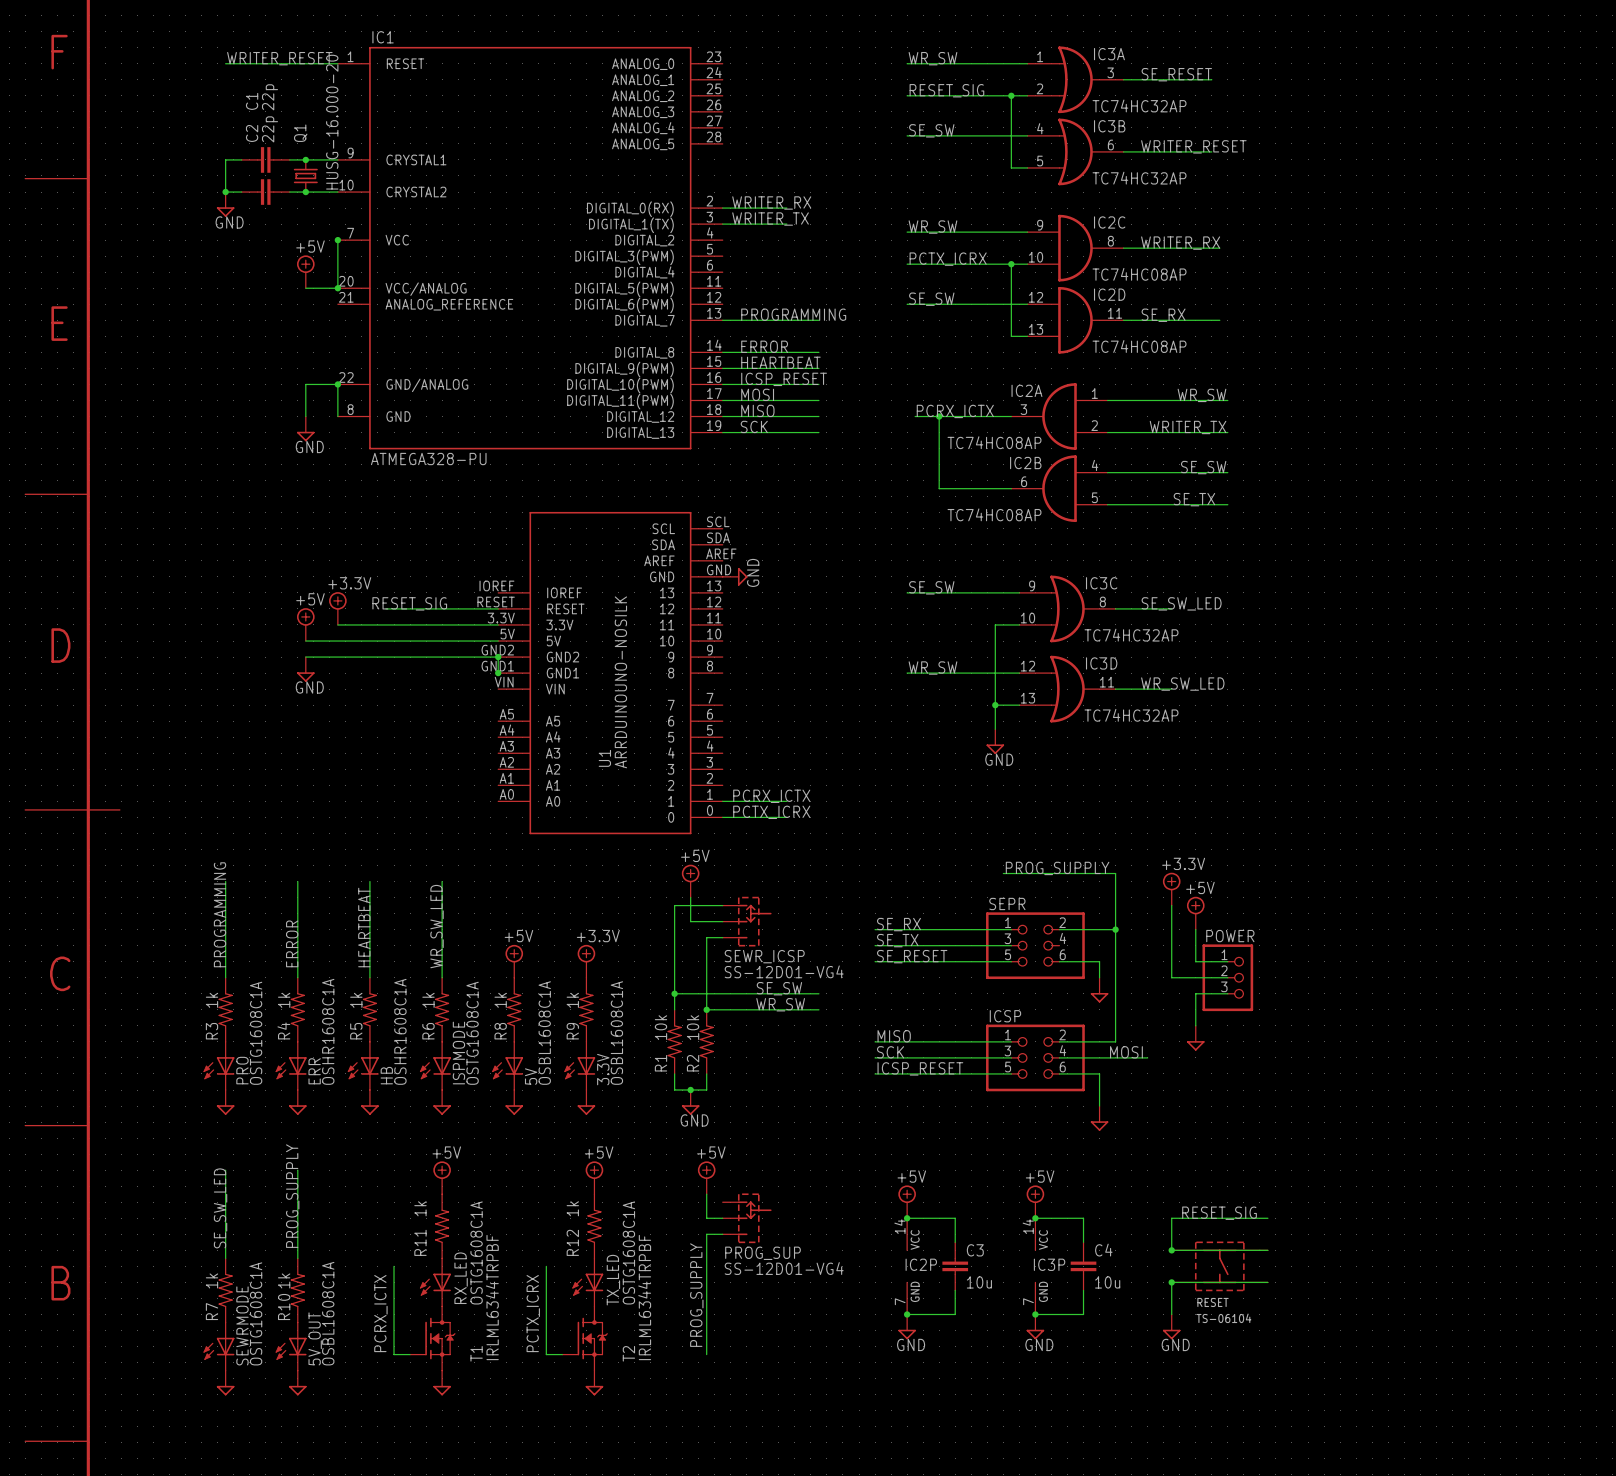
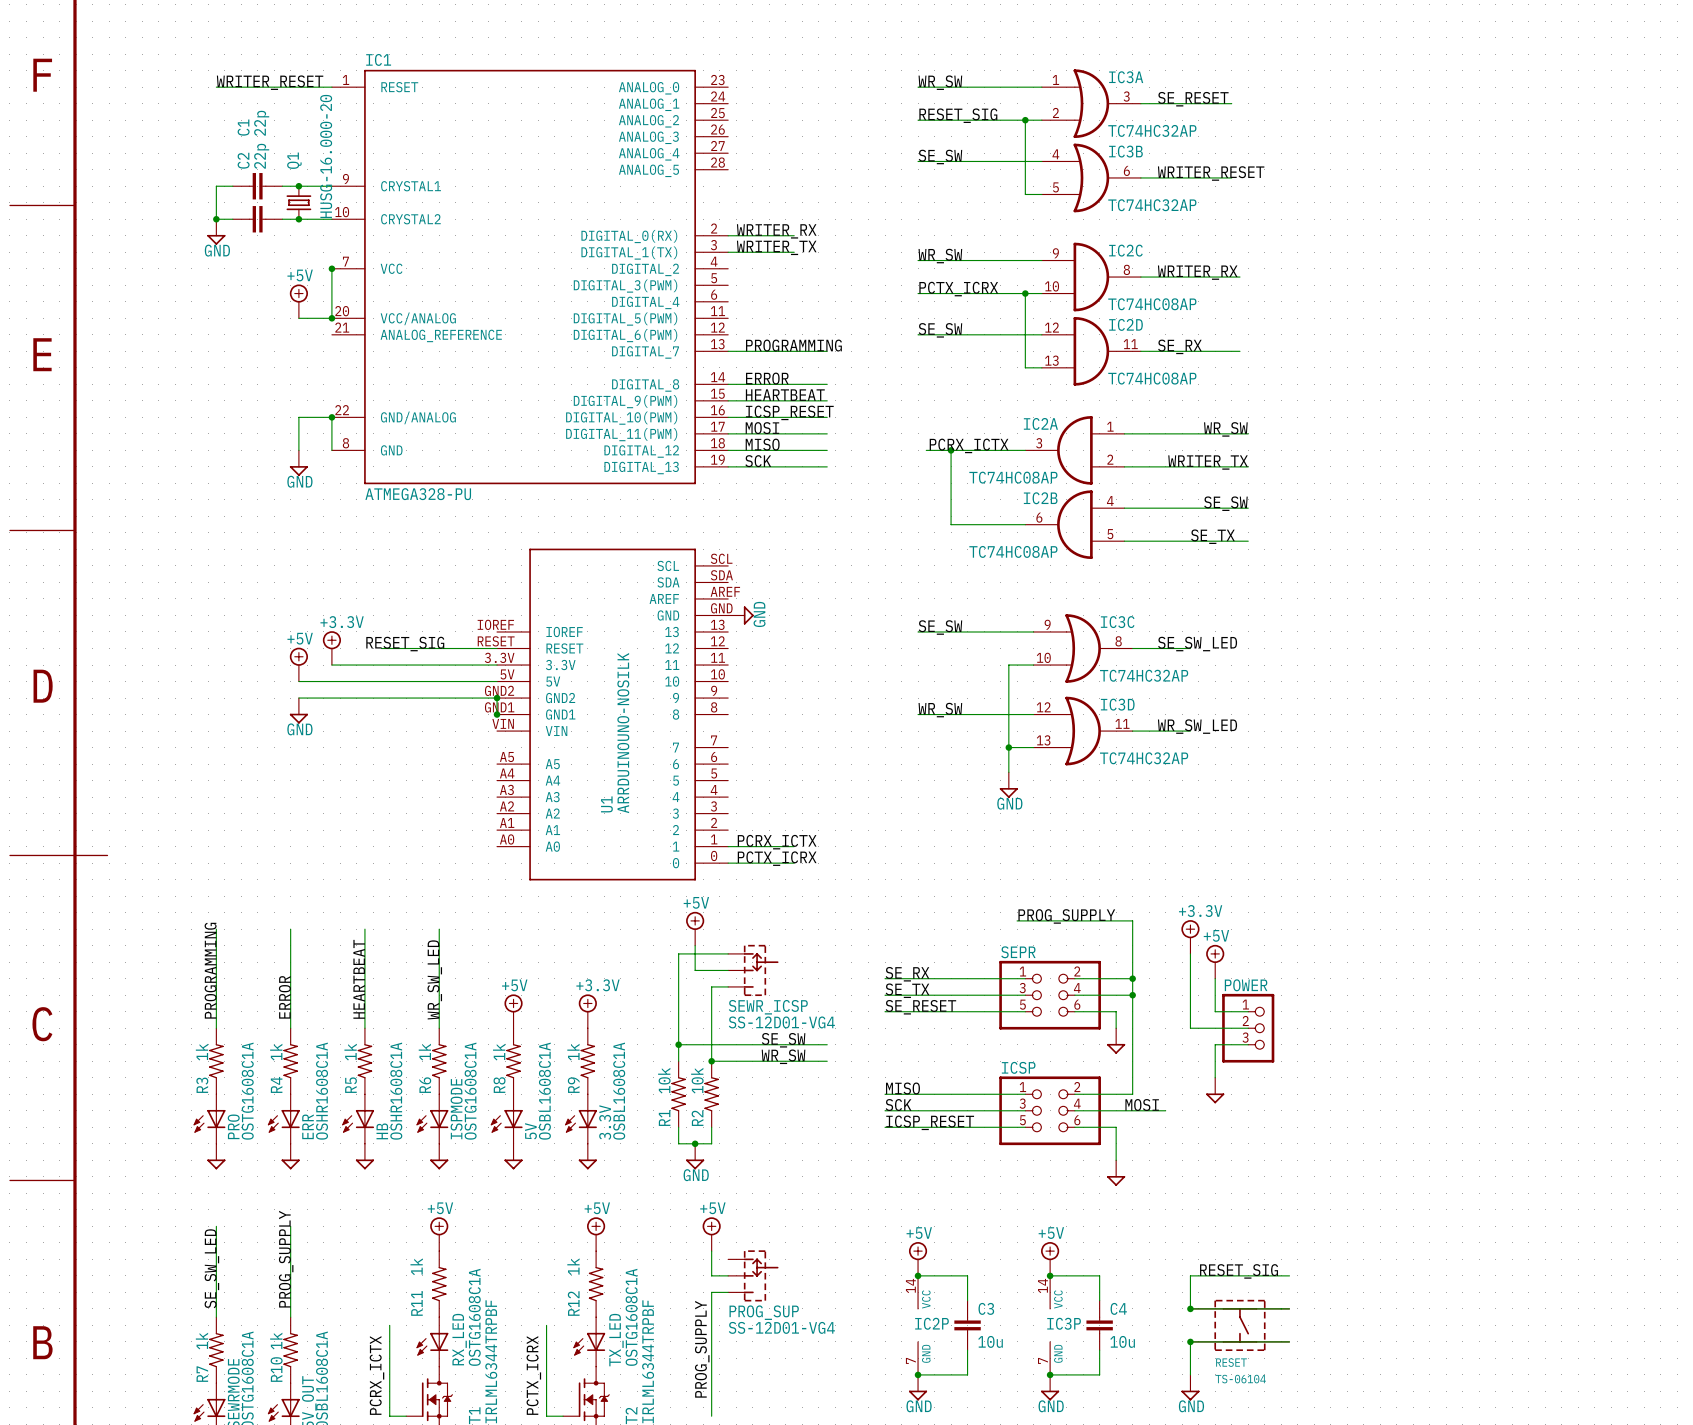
wire: none -> (1074, 995) (1132, 995)
junction: none -> (1132, 995)

